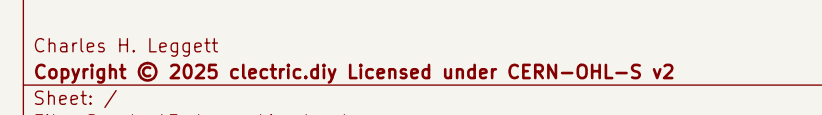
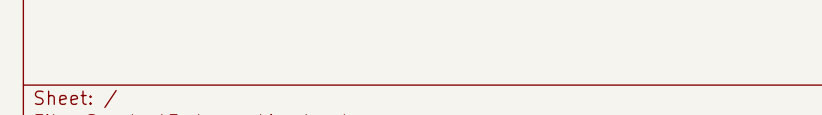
title block: Charles H. Leggett (126, 47) -> none
title block: Copyright © 2025 clectric.diy Licensed under CERN-OHL-S v2 (354, 72) -> none

